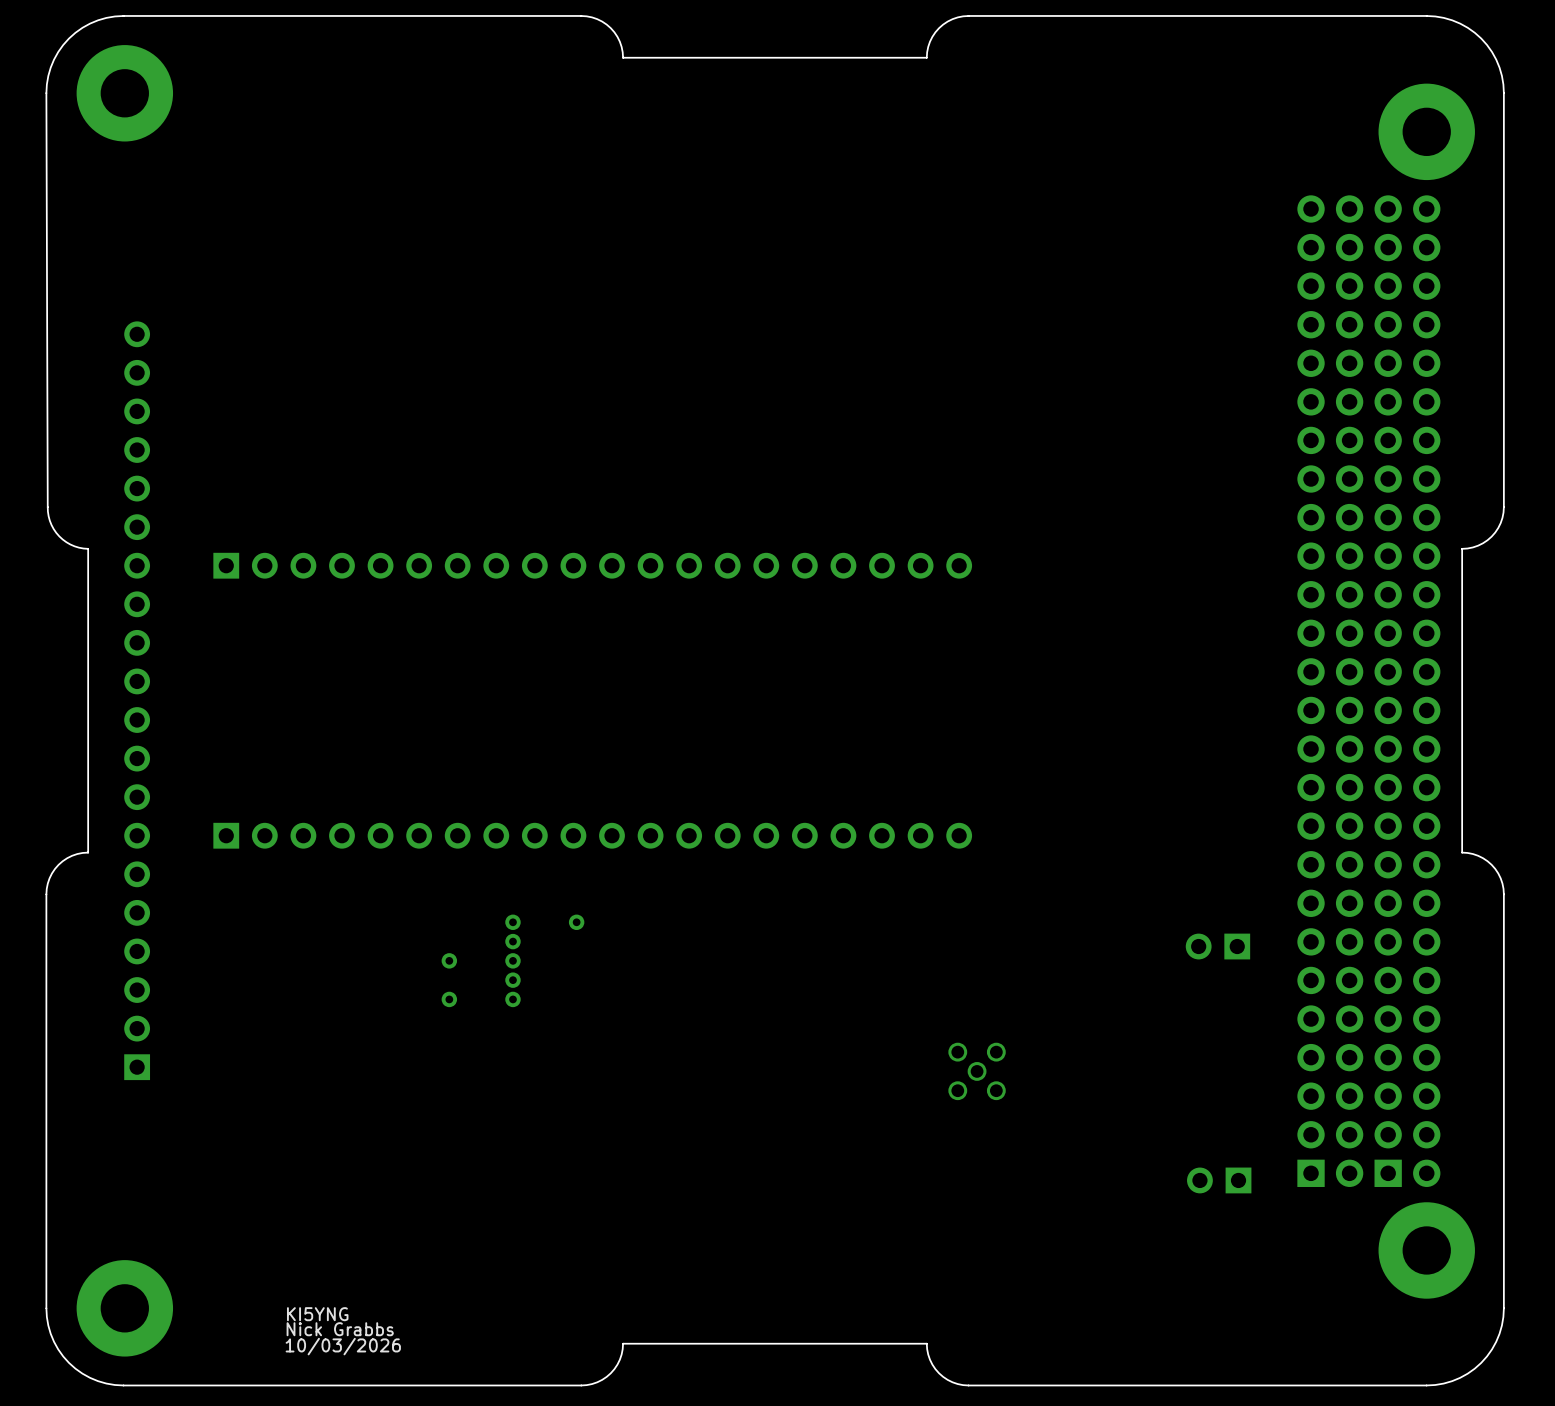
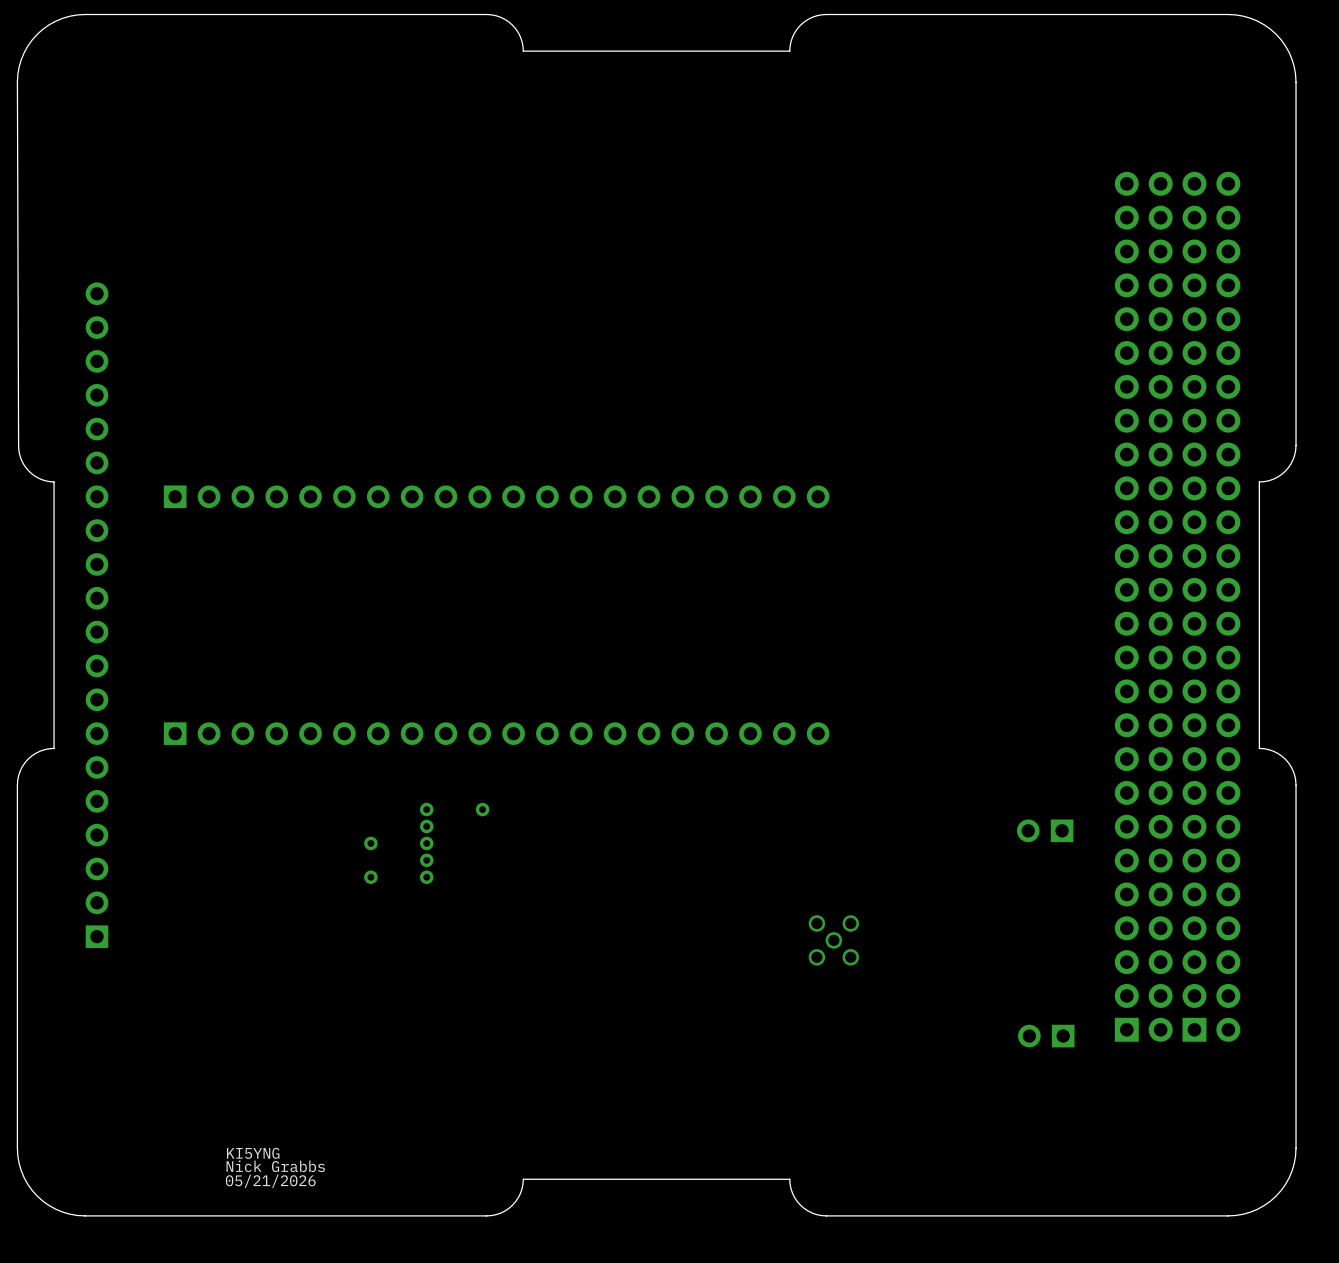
part: (124, 93) -> none
part: (1426, 131) -> none
part: (1426, 1250) -> none
part: (124, 1308) -> none
text: 10/03/2026 (343, 1346) -> 05/21/2026 (270, 1181)

